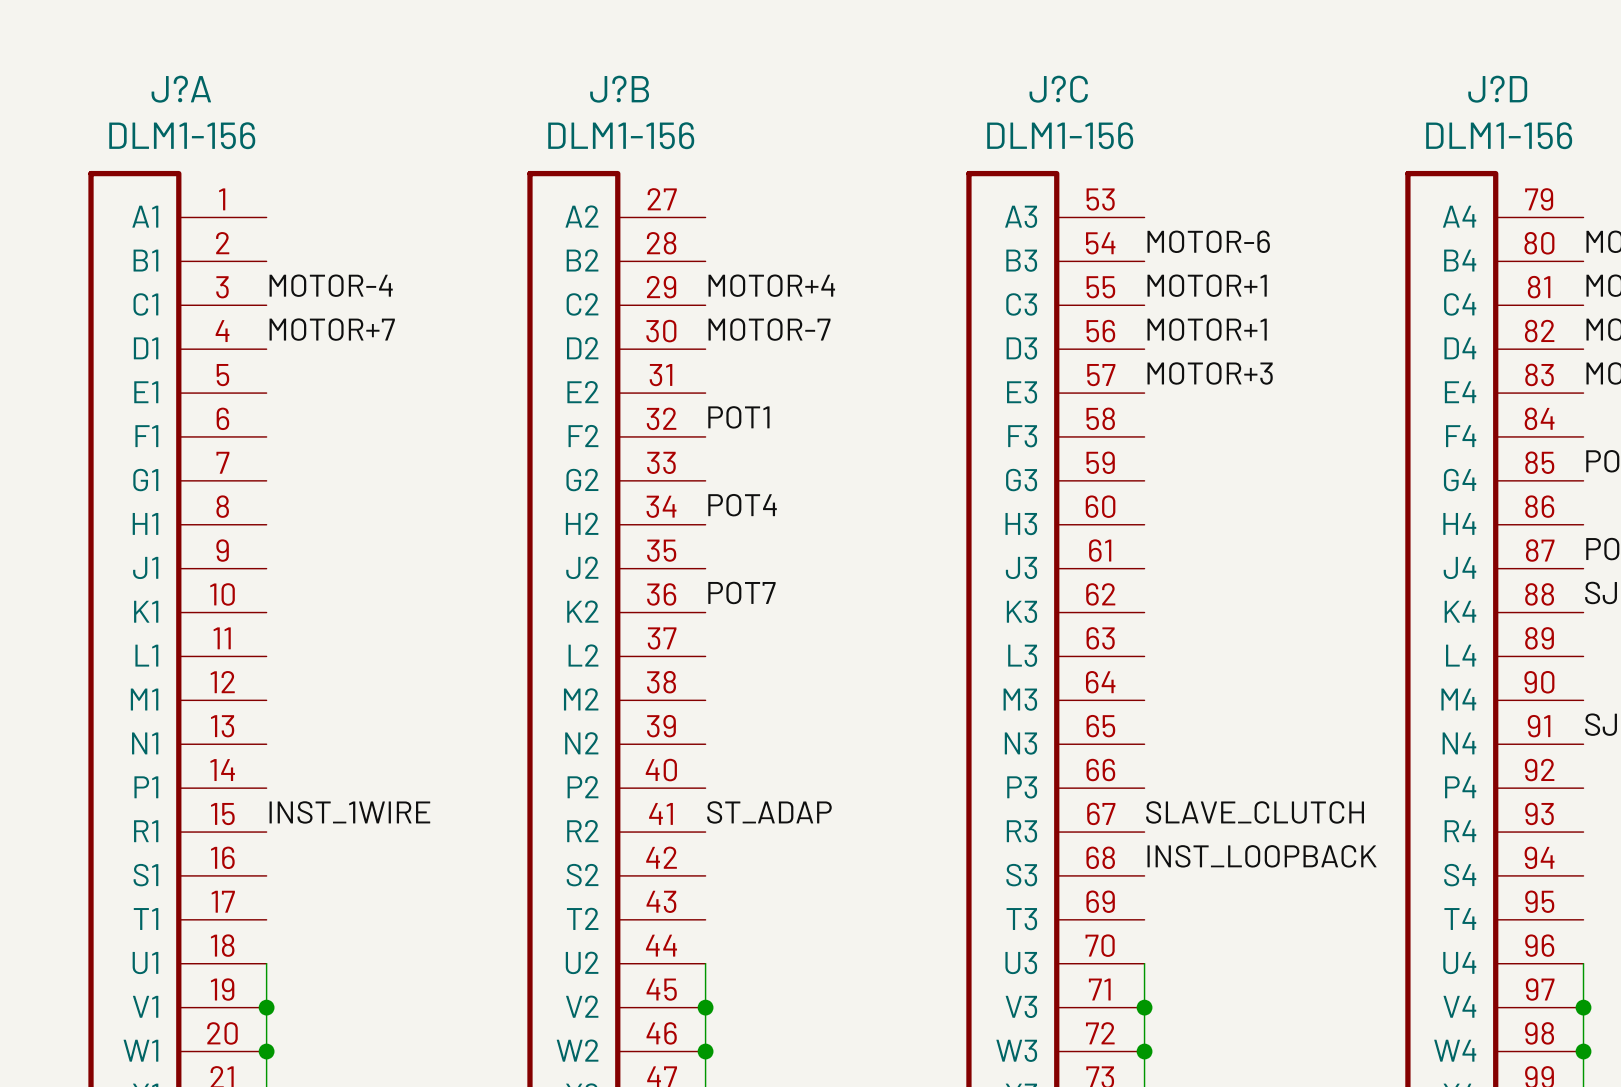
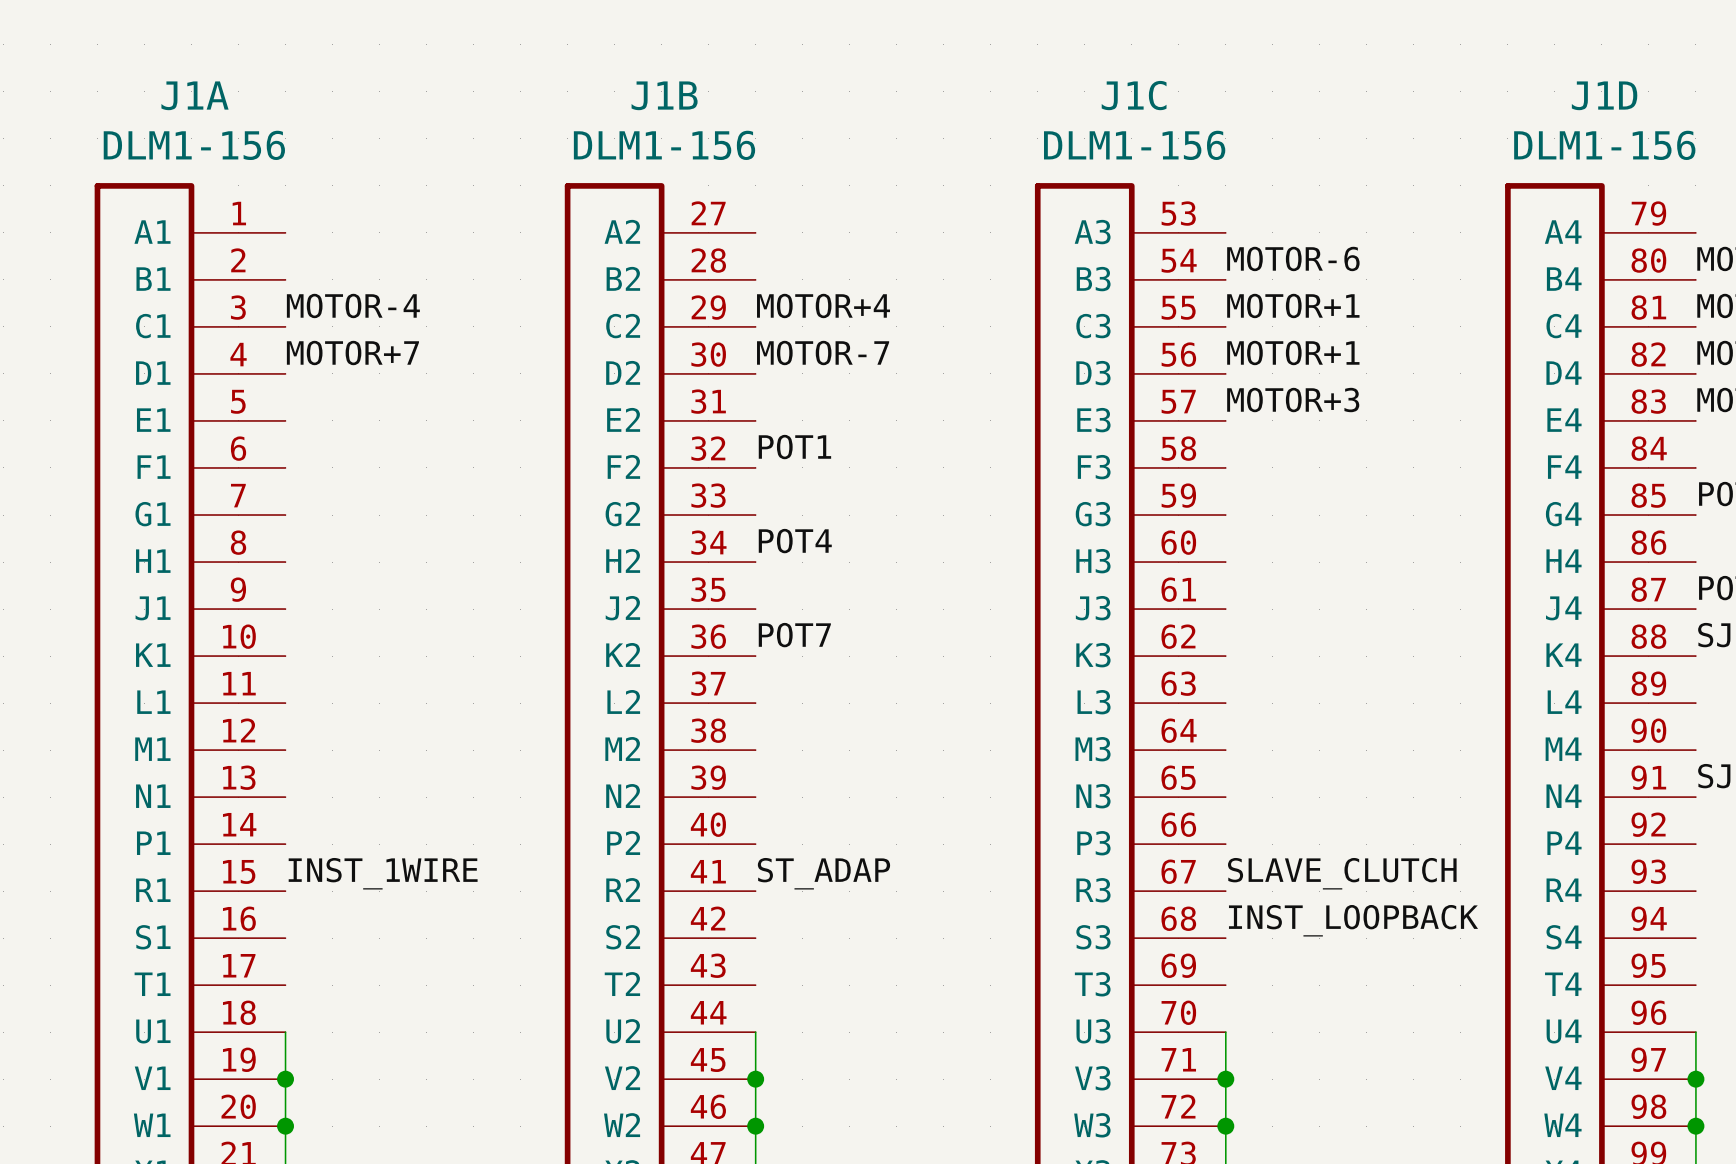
J?A name: J?A (181, 89) -> J1A (195, 95)
J?B name: J?B (619, 89) -> J1B (664, 95)
J?C name: J?C (1058, 89) -> J1C (1134, 95)
J?D name: J?D (1497, 89) -> J1D (1604, 95)

